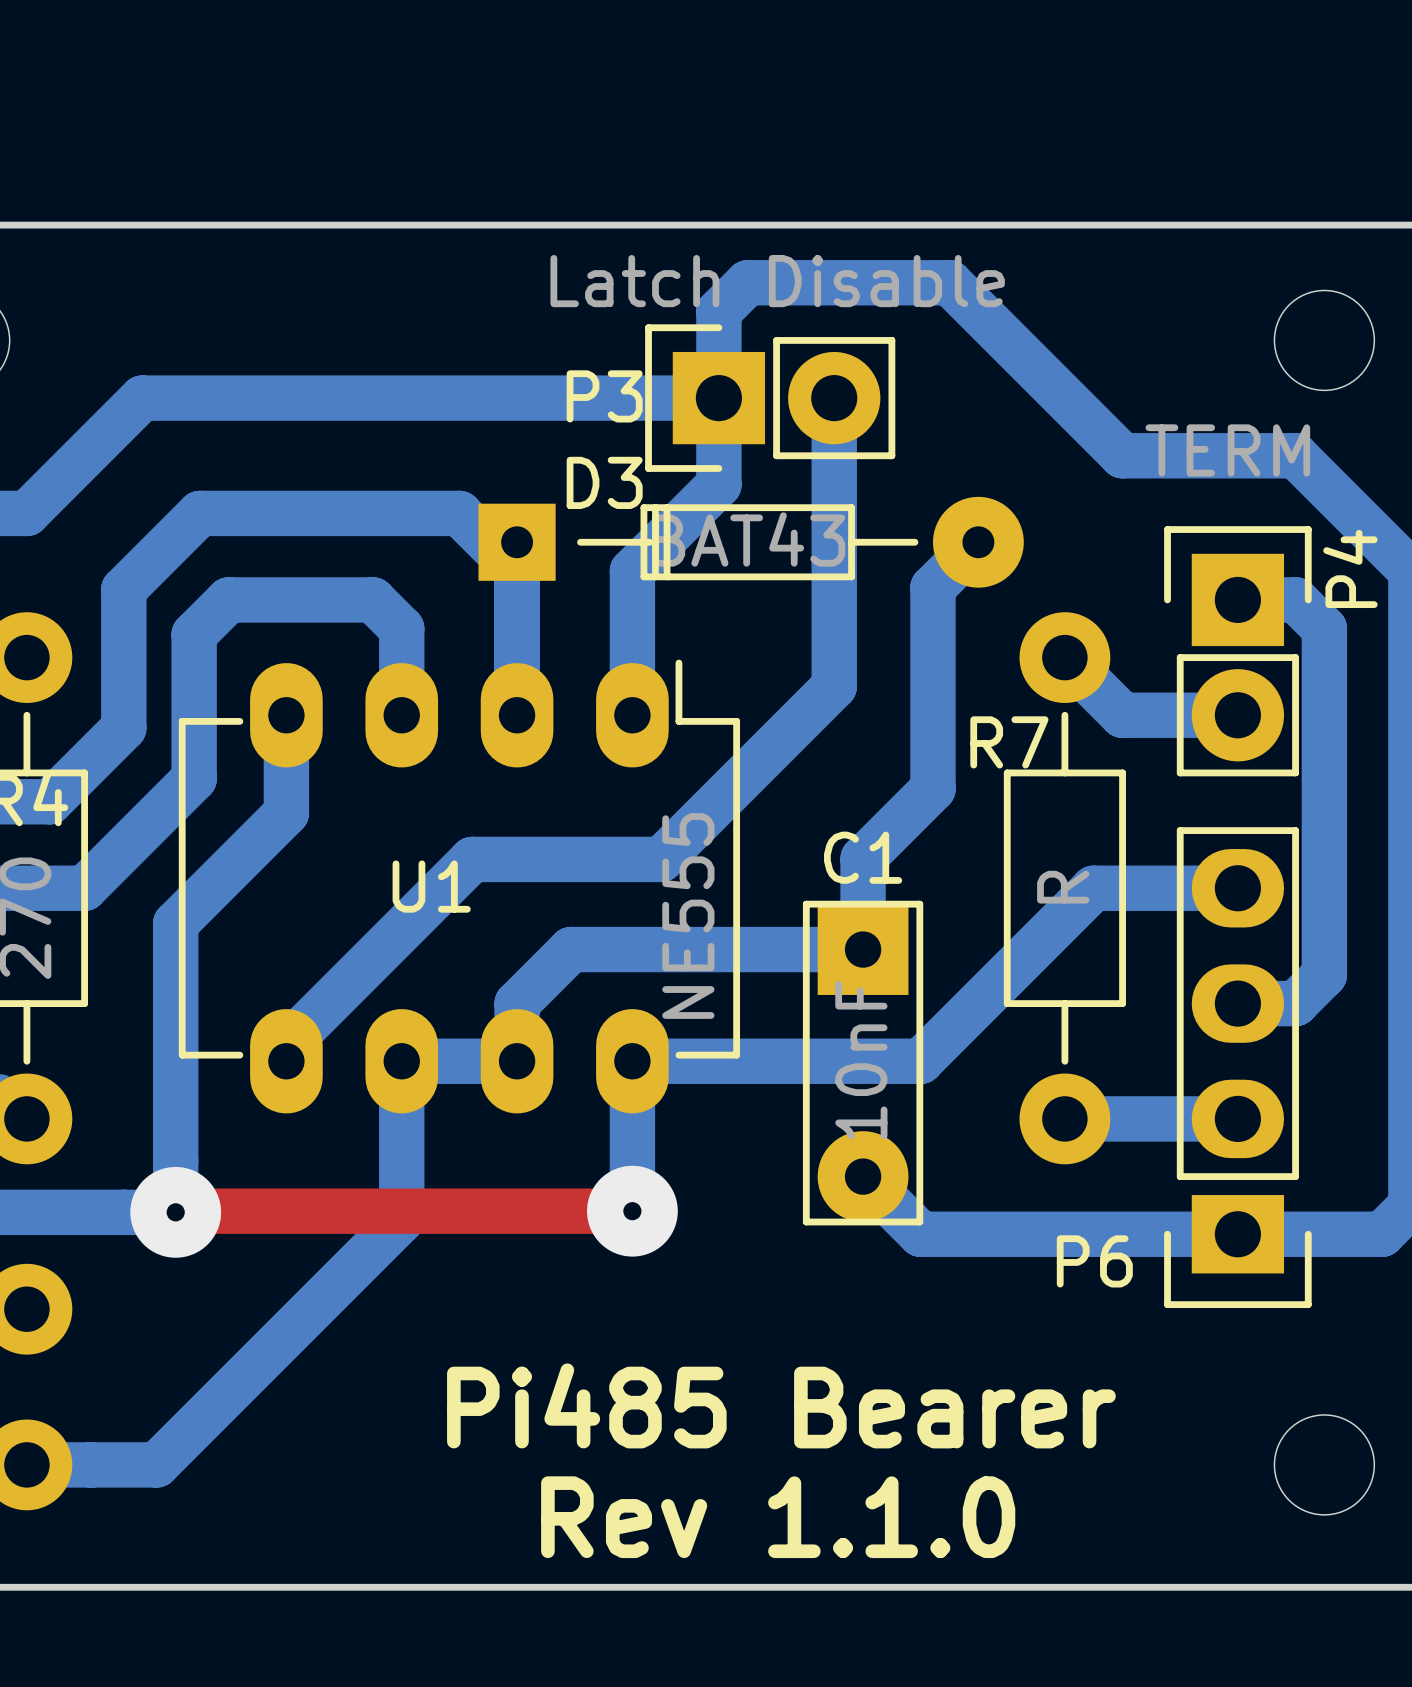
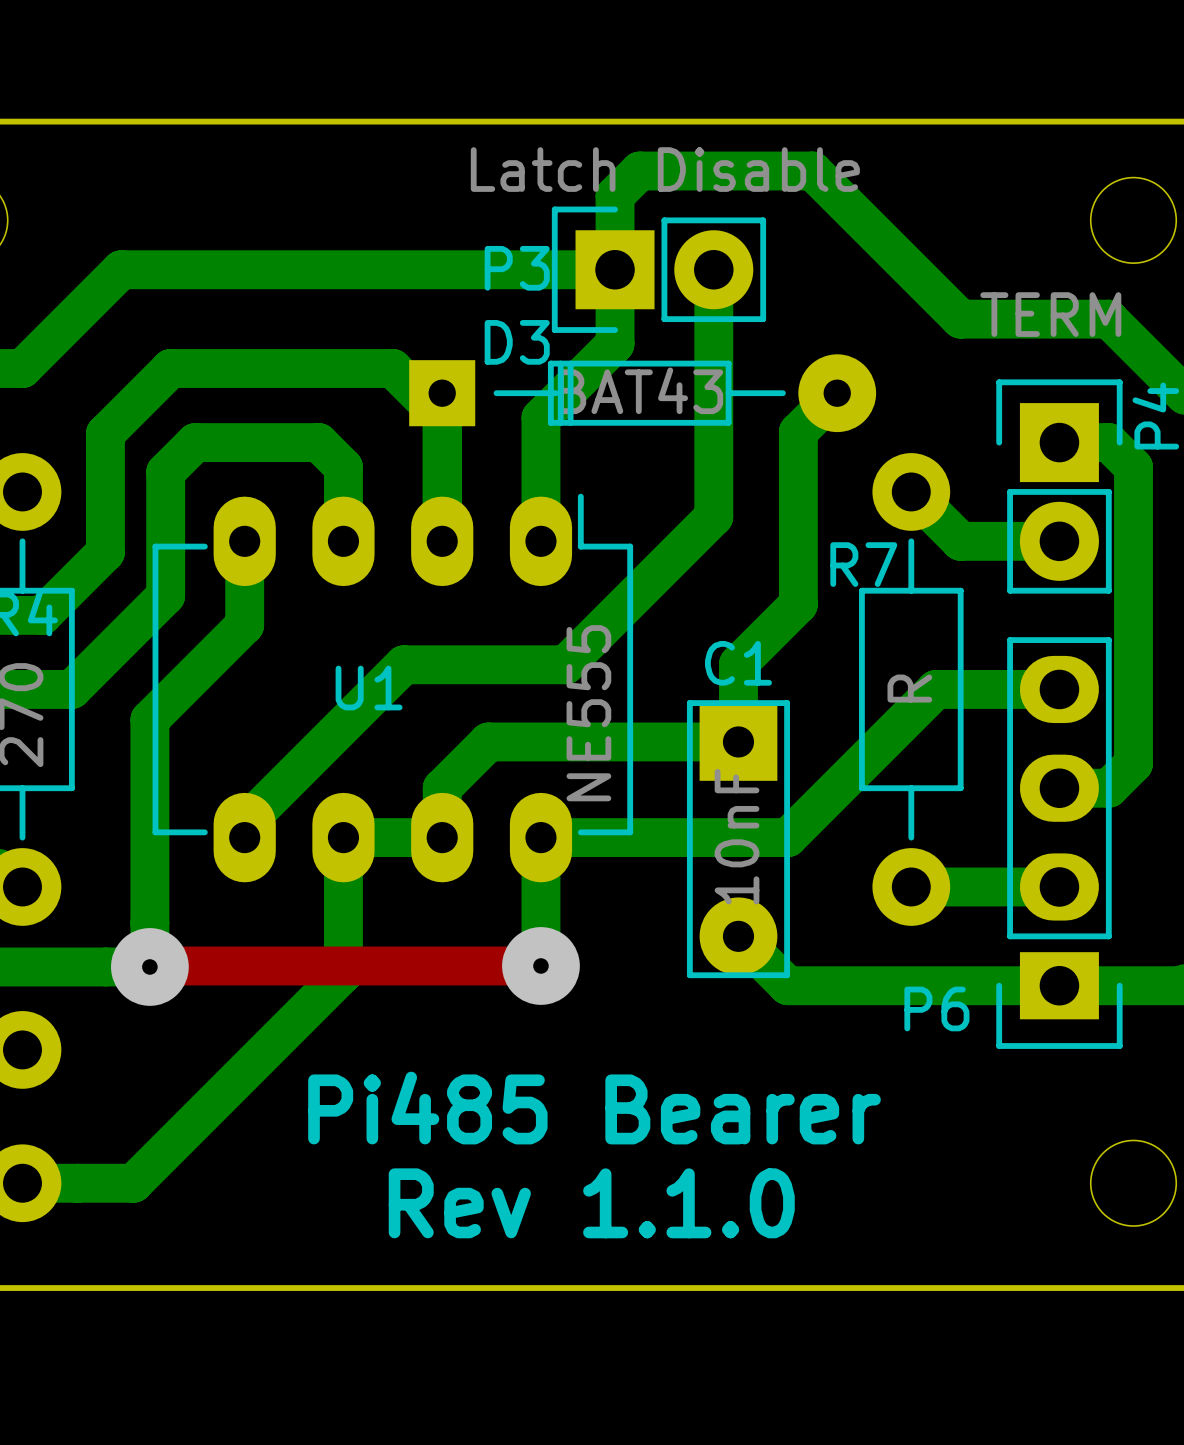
text position: Pi485 Bearer (781, 1405) -> Pi485 Bearer (594, 1108)
text position: Rev 1.1.0 (778, 1517) -> Rev 1.1.0 (591, 1203)

